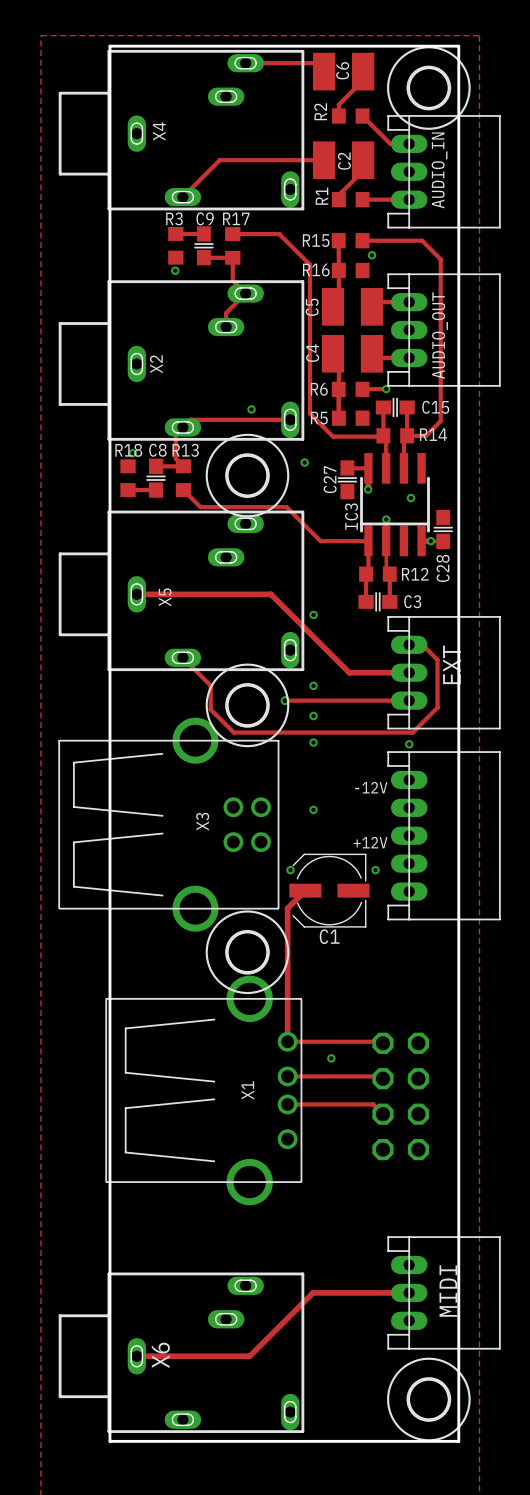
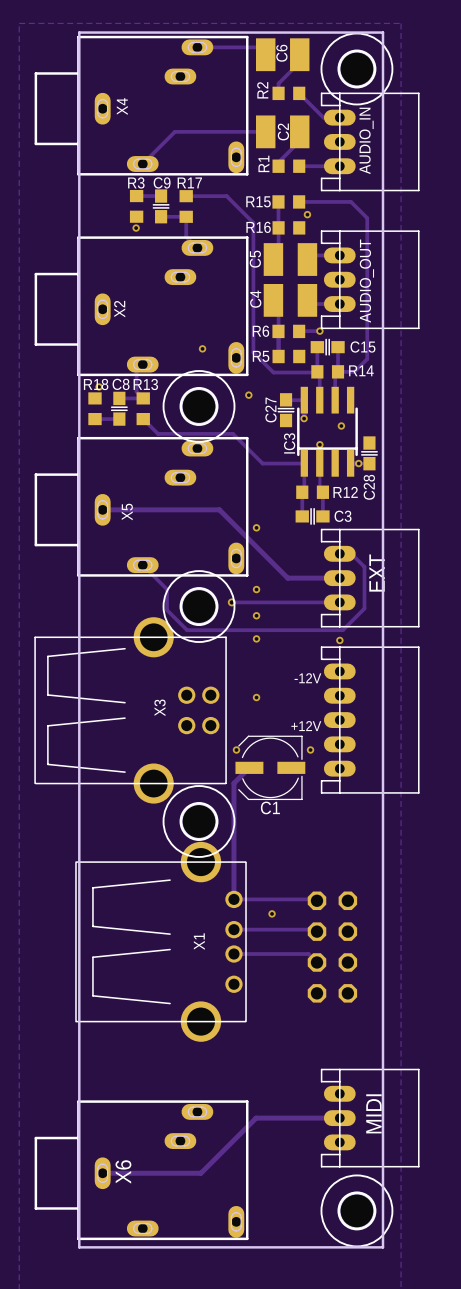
track: (245, 293) (226, 313) (226, 327) -> none
track: (290, 419) (190, 419) (182, 427) -> none

